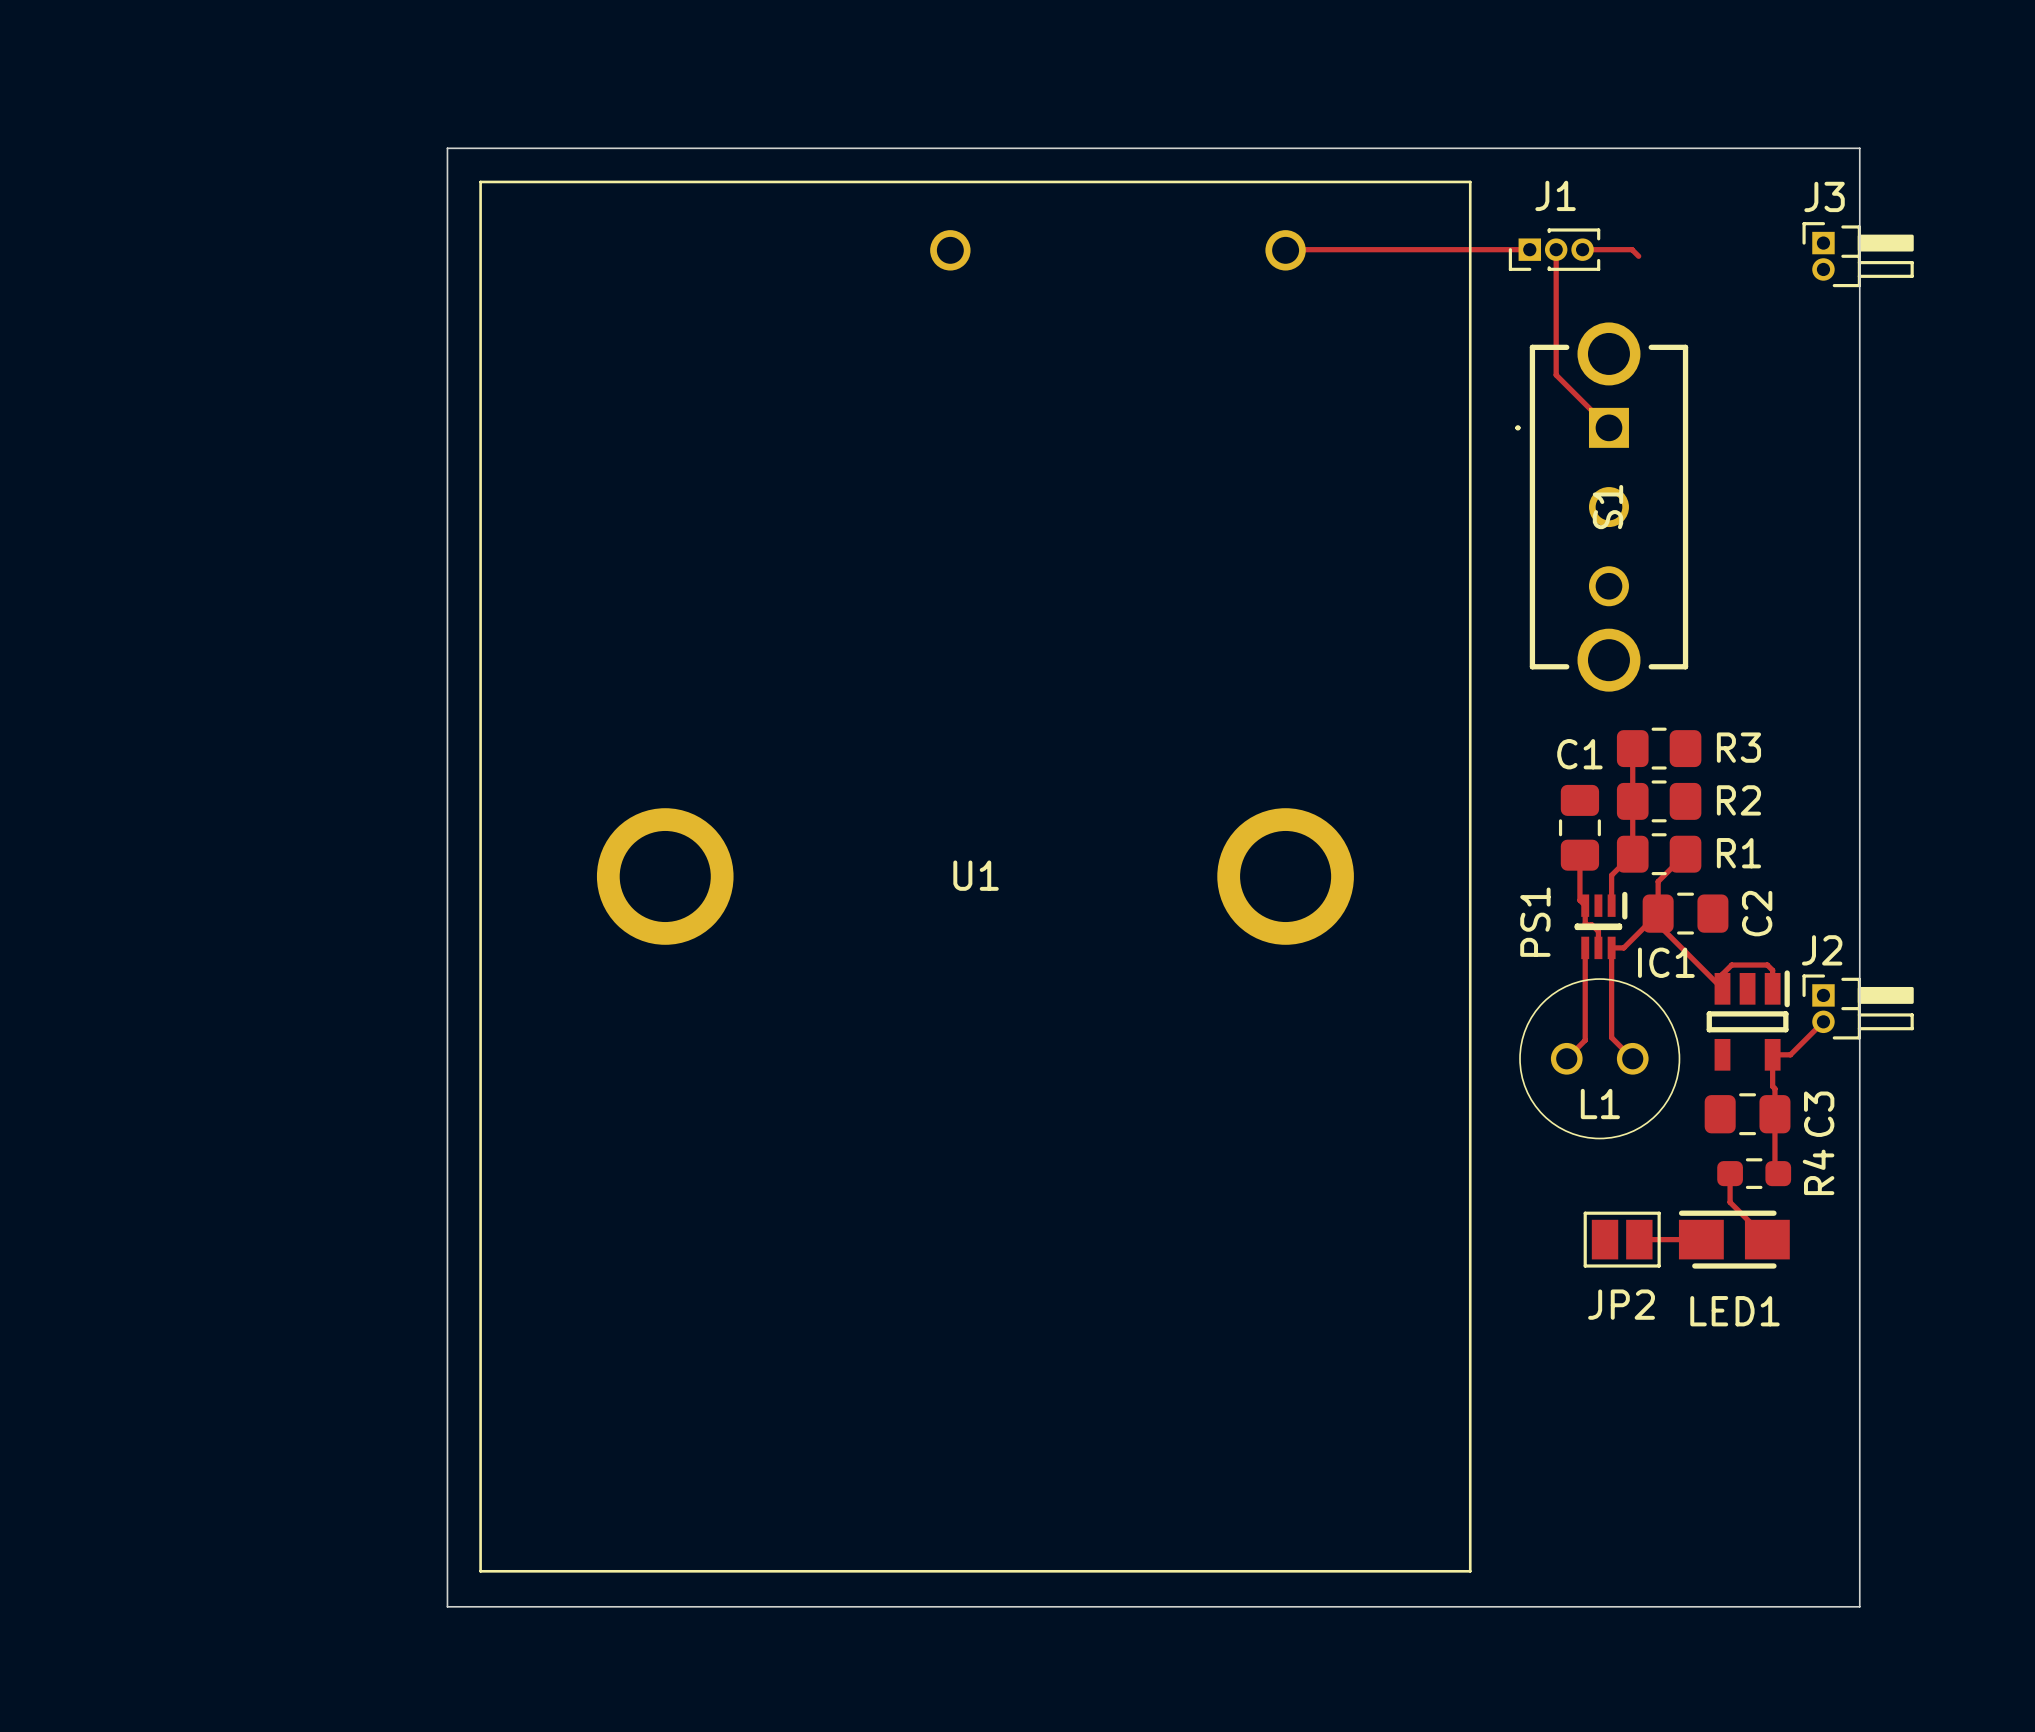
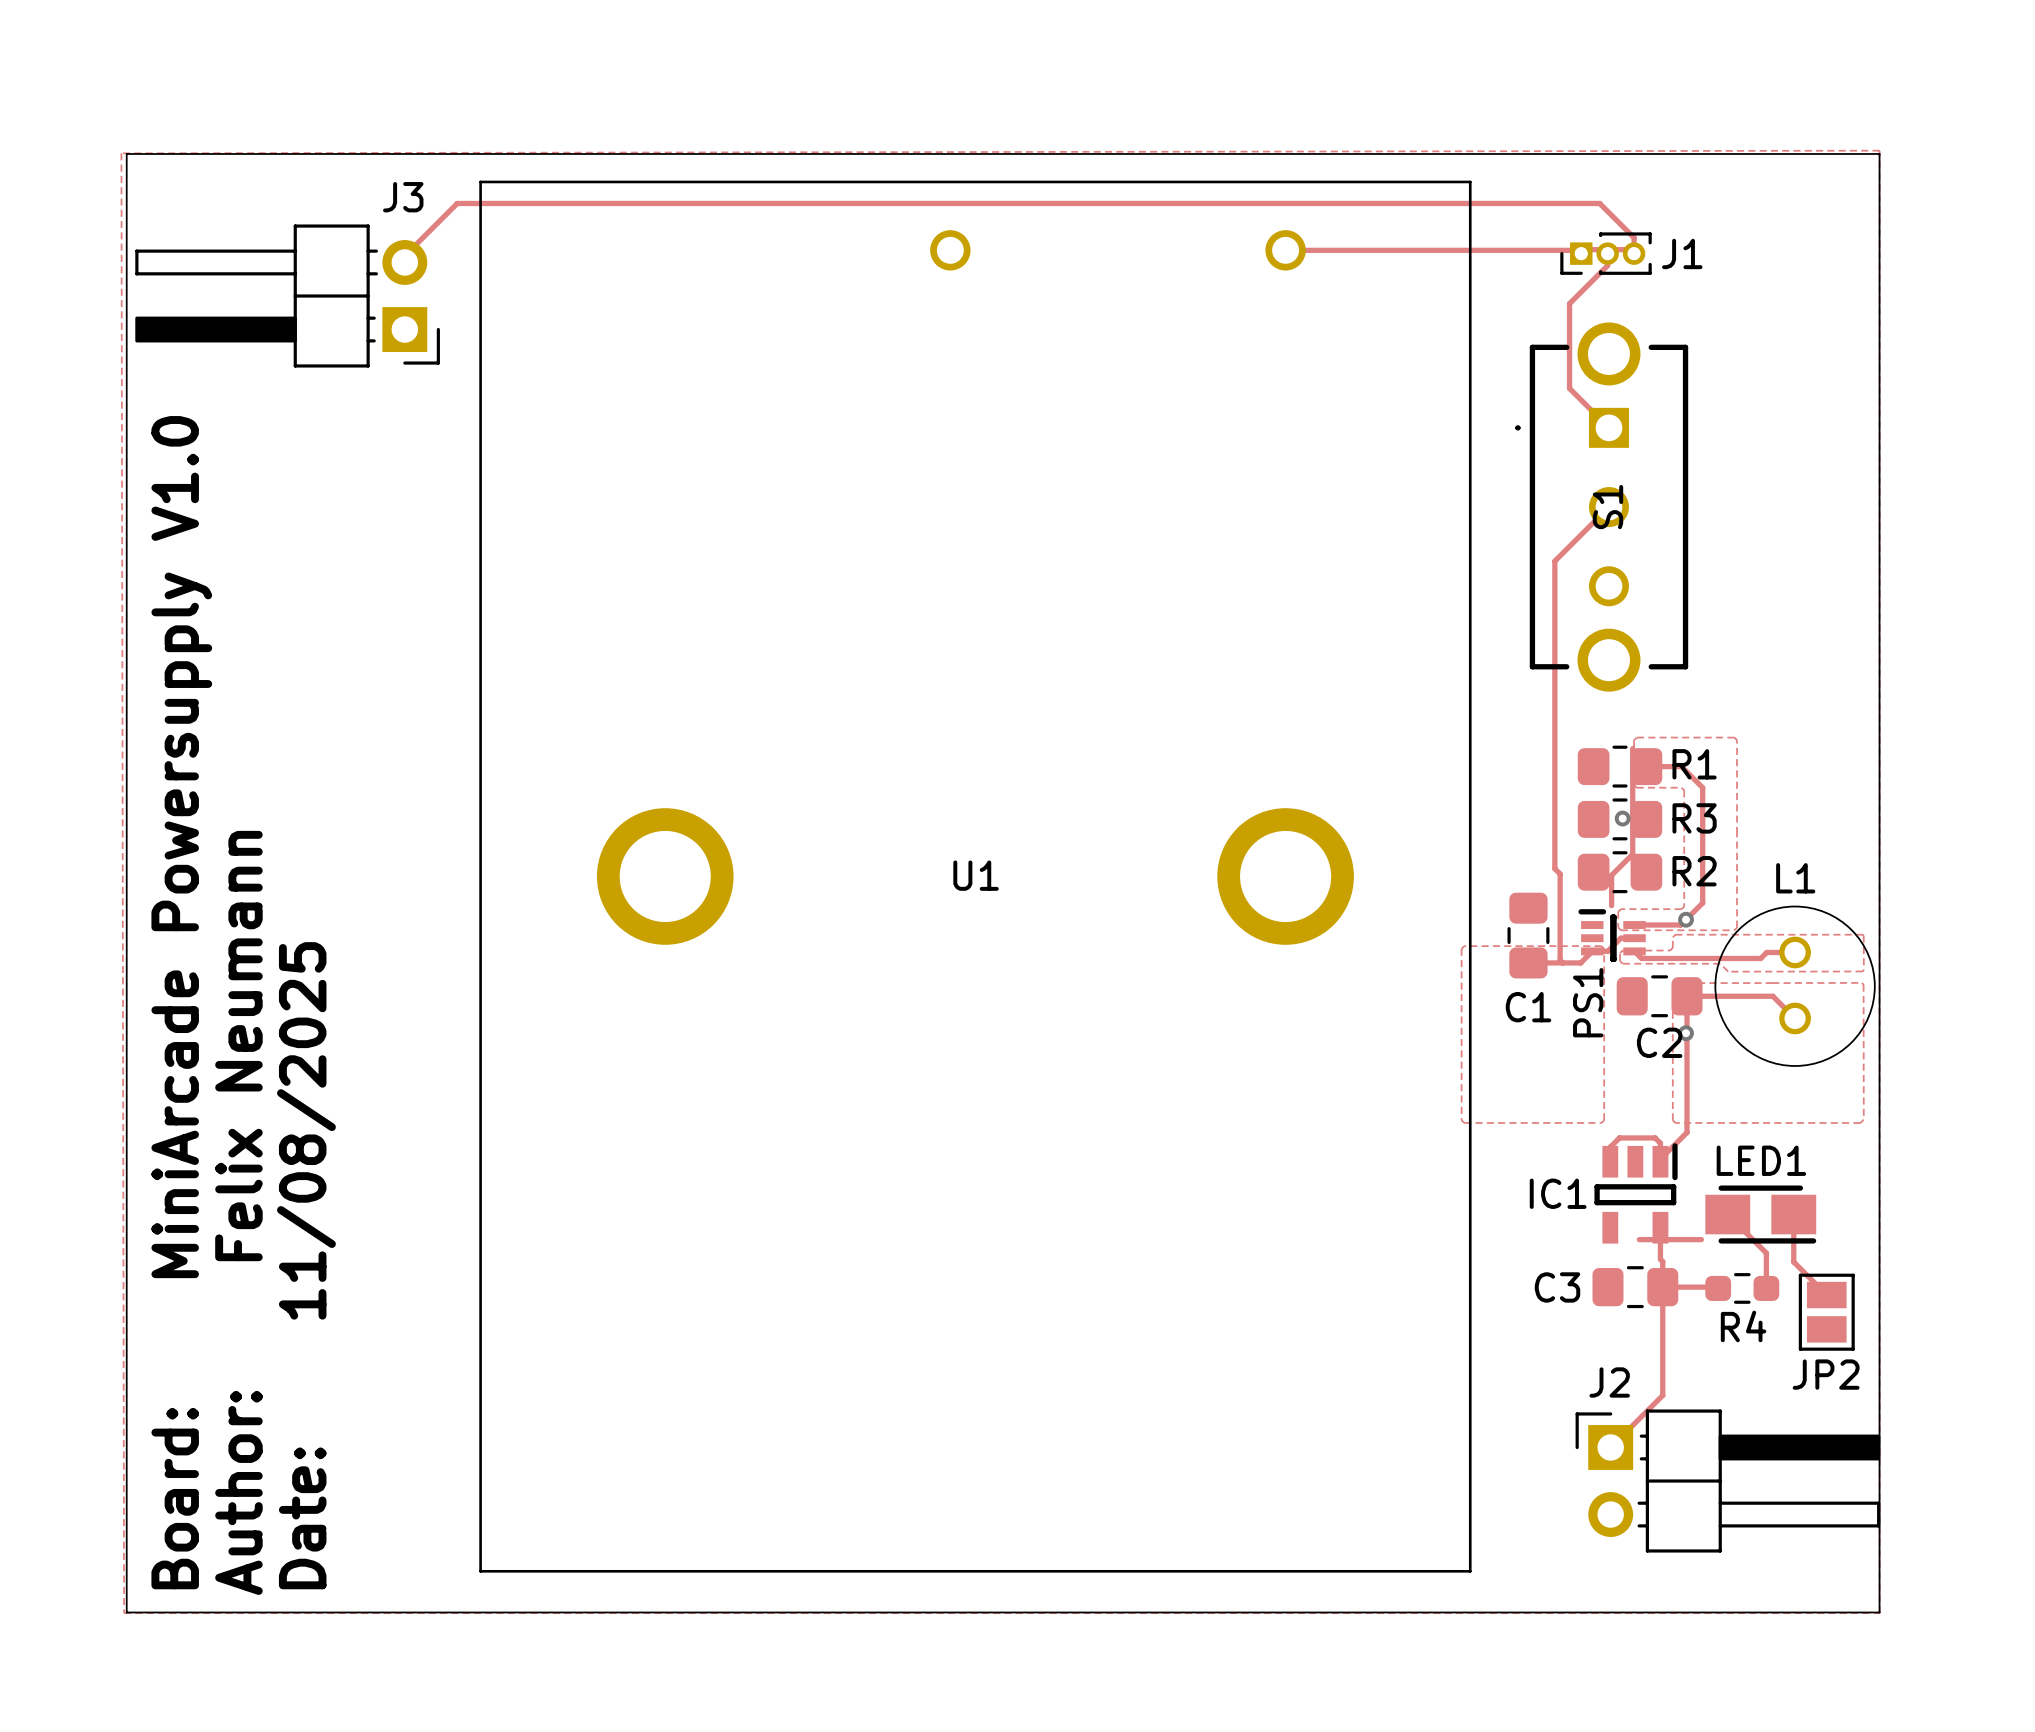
board edge: (447, 148) (1859, 148) (1859, 1606) (447, 1606) (447, 148) -> (126, 153) (126, 1612) (1879, 1612) (1879, 153) (126, 153)
zone outline: none -> (1879, 150) (1879, 1613) (124, 1613) (121, 153) (1879, 150)
J1 name position: J1 (1555, 195) -> J1 (1682, 253)
J3 name position: J3 (1824, 196) -> J3 (403, 197)
J3 footprint: [1802, 222, 1914, 288] -> [135, 224, 440, 368]
track: (1285, 249) (1529, 249) -> (1285, 250) (1577, 250) (1581, 253)
J1 position: (1554, 249) -> (1606, 253)
track: (1556, 249) (1556, 375) (1569, 388) -> (1607, 253) (1607, 265) (1569, 303) (1569, 388)
track: none -> (1634, 253) (1634, 237) (1599, 203) (457, 203) (398, 262)
track: none -> (1608, 507) (1554, 561) (1554, 868) (1560, 873) (1560, 960) (1562, 962)
zone outline: none -> (1636, 737) (1734, 737) (1737, 740) (1737, 927) (1734, 930) (1620, 930) (1618, 927) (1618, 911) (1620, 909) (1681, 909) (1684, 906) (1684, 790) (1681, 787) (1636, 787) (1634, 785) (1634, 740) (1636, 737)
R3 name position: R3 (1738, 747) -> R3 (1694, 818)
R3 position: (1659, 748) -> (1620, 819)
C1 name position: C1 (1579, 754) -> C1 (1528, 1007)
track: none -> (1646, 766) (1681, 766) (1702, 787) (1702, 903) (1680, 925) (1634, 925)
R2 name position: R2 (1738, 800) -> R2 (1694, 871)
R2 position: (1659, 801) -> (1620, 872)
via: none -> (1622, 818)
C1 position: (1579, 827) -> (1528, 935)
R1 name position: R1 (1738, 853) -> R1 (1694, 764)
R1 position: (1659, 854) -> (1620, 766)
track: (1685, 854) (1658, 881) (1658, 924) (1722, 988) (1722, 974) (1731, 965) (1767, 965) (1772, 970) (1772, 988) -> none
track: (1579, 855) (1579, 900) (1585, 905) (1585, 923) (1591, 924) (1598, 931) (1598, 947) -> none
track: (1658, 913) (1623, 947) (1611, 947) (1611, 1037) (1632, 1058) -> none
C2 position: (1685, 913) -> (1659, 996)
C2 name rotation: 0° (1757, 913) -> 90° clockwise (1659, 1042)
C2 name position: C2 (1757, 913) -> C2 (1659, 1042)
via: none -> (1686, 919)
PS1 rotation: 0° (1601, 925) -> 90° counterclockwise (1612, 935)
zone outline: none -> (1675, 934) (1672, 937) (1672, 947) (1670, 950) (1622, 950) (1620, 953) (1620, 961) (1622, 963) (1720, 963) (1728, 971) (1863, 970) (1862, 934) (1675, 934)
track: none -> (1634, 938) (1620, 938) (1607, 951) (1592, 951) (1580, 962) (1528, 962)
zone outline: none -> (1464, 946) (1601, 946) (1604, 948) (1604, 1120) (1601, 1122) (1464, 1122) (1461, 1120) (1461, 948) (1464, 946)
track: (1585, 947) (1585, 1040) (1566, 1058) -> none
J2 name position: J2 (1822, 950) -> J2 (1609, 1382)
track: none -> (1634, 951) (1641, 958) (1760, 958) (1766, 952) (1795, 952)
IC1 name position: IC1 (1666, 962) -> IC1 (1558, 1193)
J2 footprint: [1802, 974, 1914, 1040] -> [1575, 1409, 1881, 1553]
zone outline: none -> (1675, 983) (1672, 985) (1672, 1120) (1675, 1122) (1860, 1123) (1863, 1119) (1863, 984) (1861, 982) (1675, 983)
text: none -> Board: MiniArcade Powersupply V1.0 (181, 1002)
track: none -> (1795, 1018) (1772, 996) (1687, 996) (1687, 1132) (1660, 1159)
IC1 position: (1748, 1020) -> (1636, 1193)
track: (1823, 1021) (1790, 1054) (1772, 1054) (1772, 1086) (1774, 1088) (1774, 1170) (1778, 1173) -> none
via: none -> (1686, 1033)
L1 rotation: 0° (1599, 1058) -> 90° clockwise (1795, 985)
L1 position: (1599, 1058) -> (1795, 985)
drawing position: (1599, 1058) -> (1795, 986)
L1 name position: L1 (1600, 1103) -> L1 (1795, 878)
C3 position: (1747, 1114) -> (1635, 1287)
C3 name rotation: 0° (1819, 1114) -> 90° clockwise (1557, 1287)
C3 name position: C3 (1819, 1114) -> C3 (1557, 1287)
track: none -> (1610, 1161) (1610, 1147) (1619, 1137) (1655, 1137) (1660, 1143) (1660, 1161)
R4 name rotation: 0° (1818, 1172) -> 90° clockwise (1743, 1326)
R4 name position: R4 (1818, 1172) -> R4 (1743, 1326)
track: (1730, 1173) (1730, 1202) (1767, 1239) -> none
R4 position: (1754, 1173) -> (1742, 1288)
text: none -> Author: Felix Neumann (238, 1212)
track: none -> (1727, 1214) (1766, 1253) (1766, 1288)
track: none -> (1793, 1214) (1793, 1262) (1826, 1295)
track: none -> (1660, 1227) (1660, 1259) (1662, 1261) (1662, 1395) (1610, 1447)
JP2 rotation: 0° (1622, 1239) -> 90° clockwise (1826, 1312)
JP2 position: (1622, 1239) -> (1826, 1312)
LED1 rotation: 0° (1734, 1239) -> 180° (1760, 1214)
text: none -> Date: 11/08/2025 (306, 1265)
track: none -> (1653, 1287) (1718, 1288)

